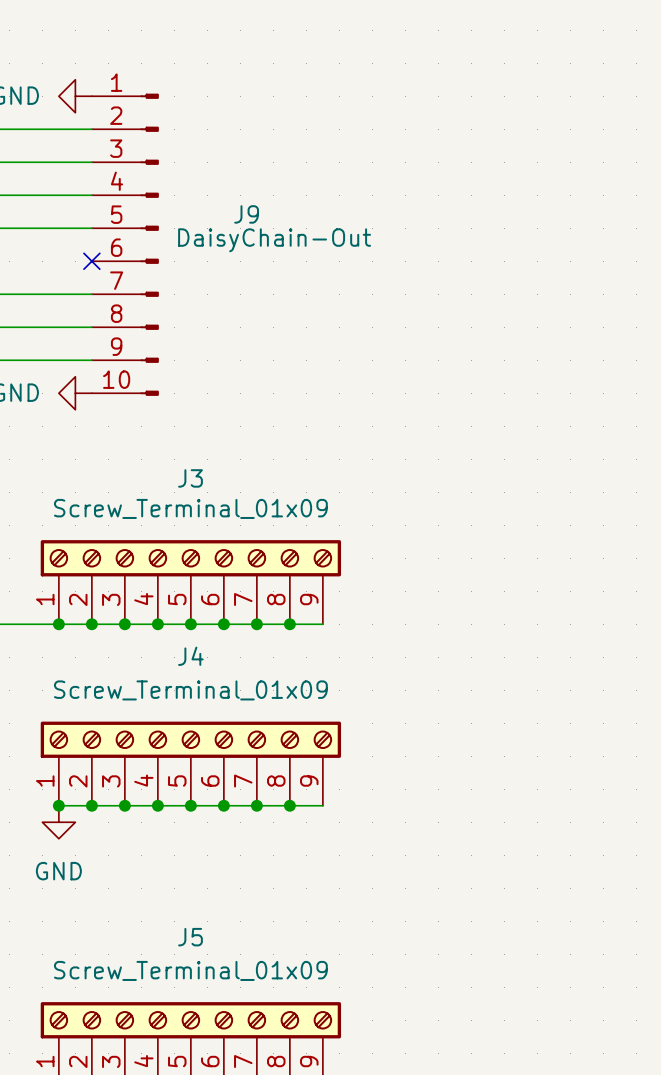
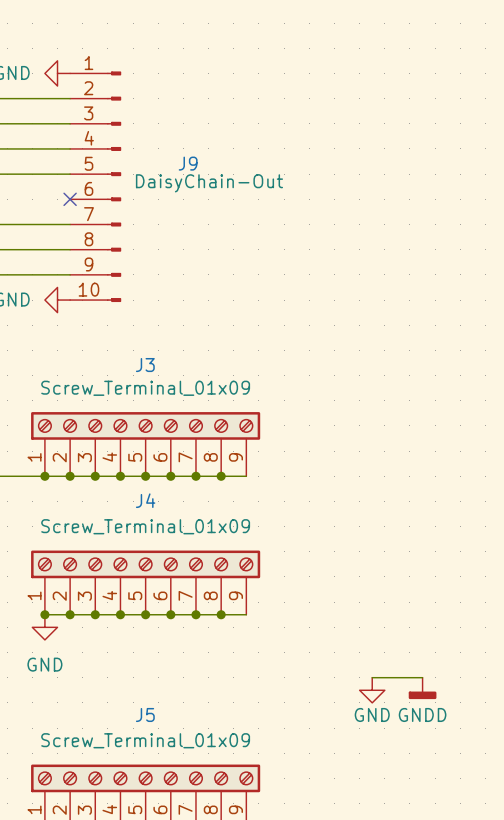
wire: none -> (372, 677) (422, 677)
power symbol: none -> GNDD (422, 688)
power symbol: none -> GND (372, 690)

